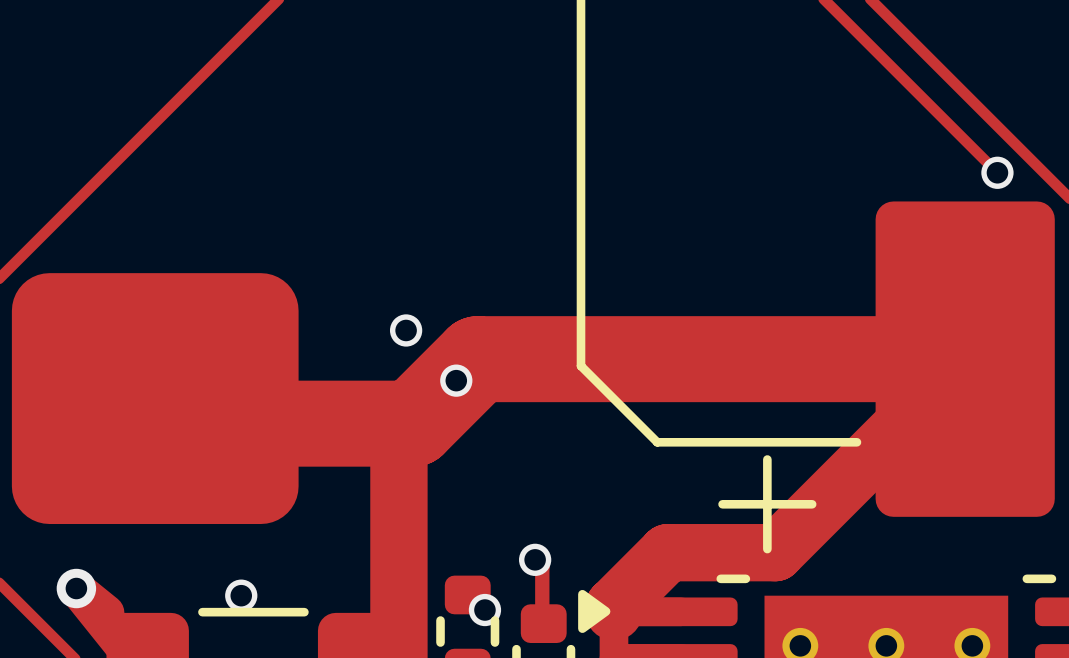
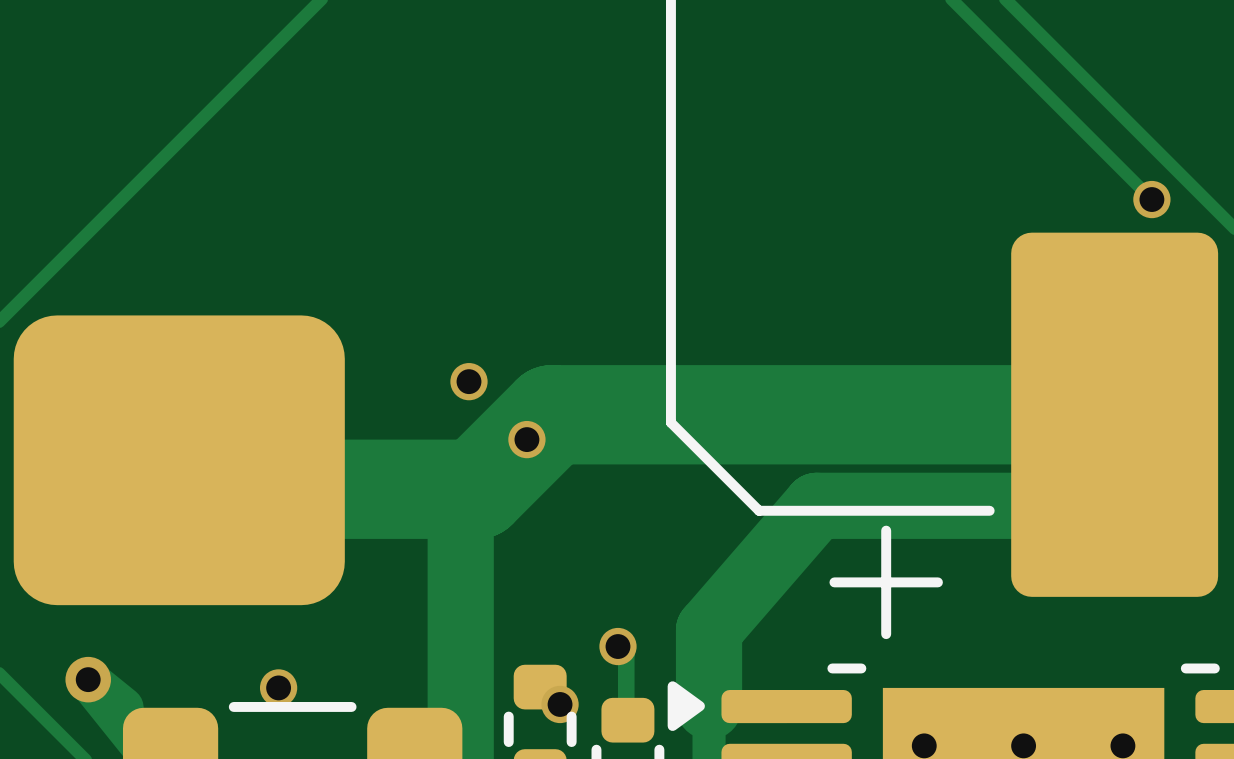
track: (965, 362) (775, 552) (667, 552) (613, 606) -> (1114, 418) (1114, 505) (816, 505) (709, 629) (709, 700)

